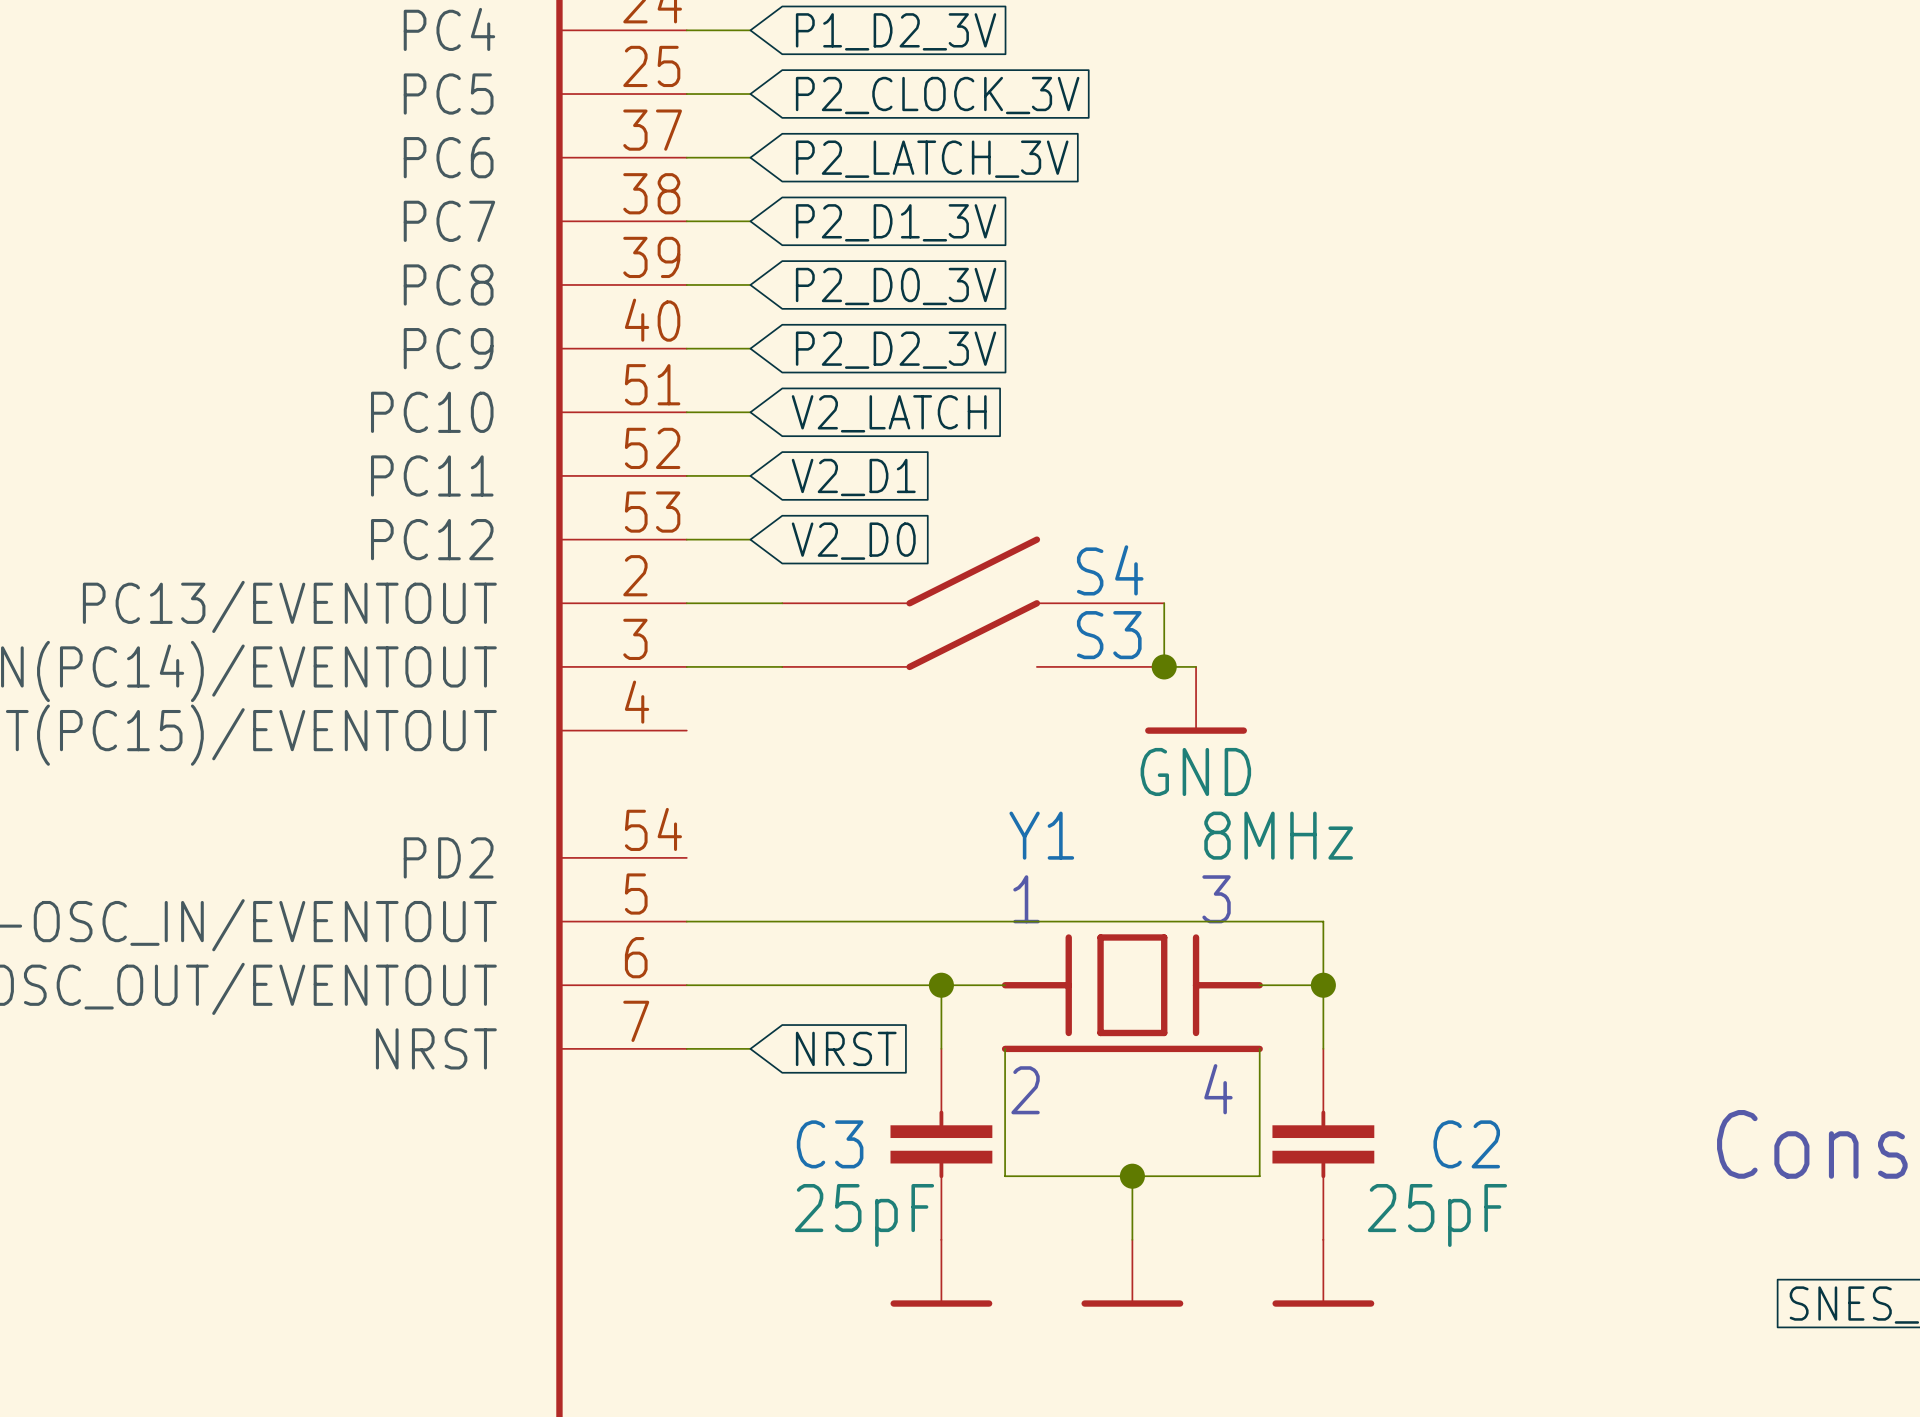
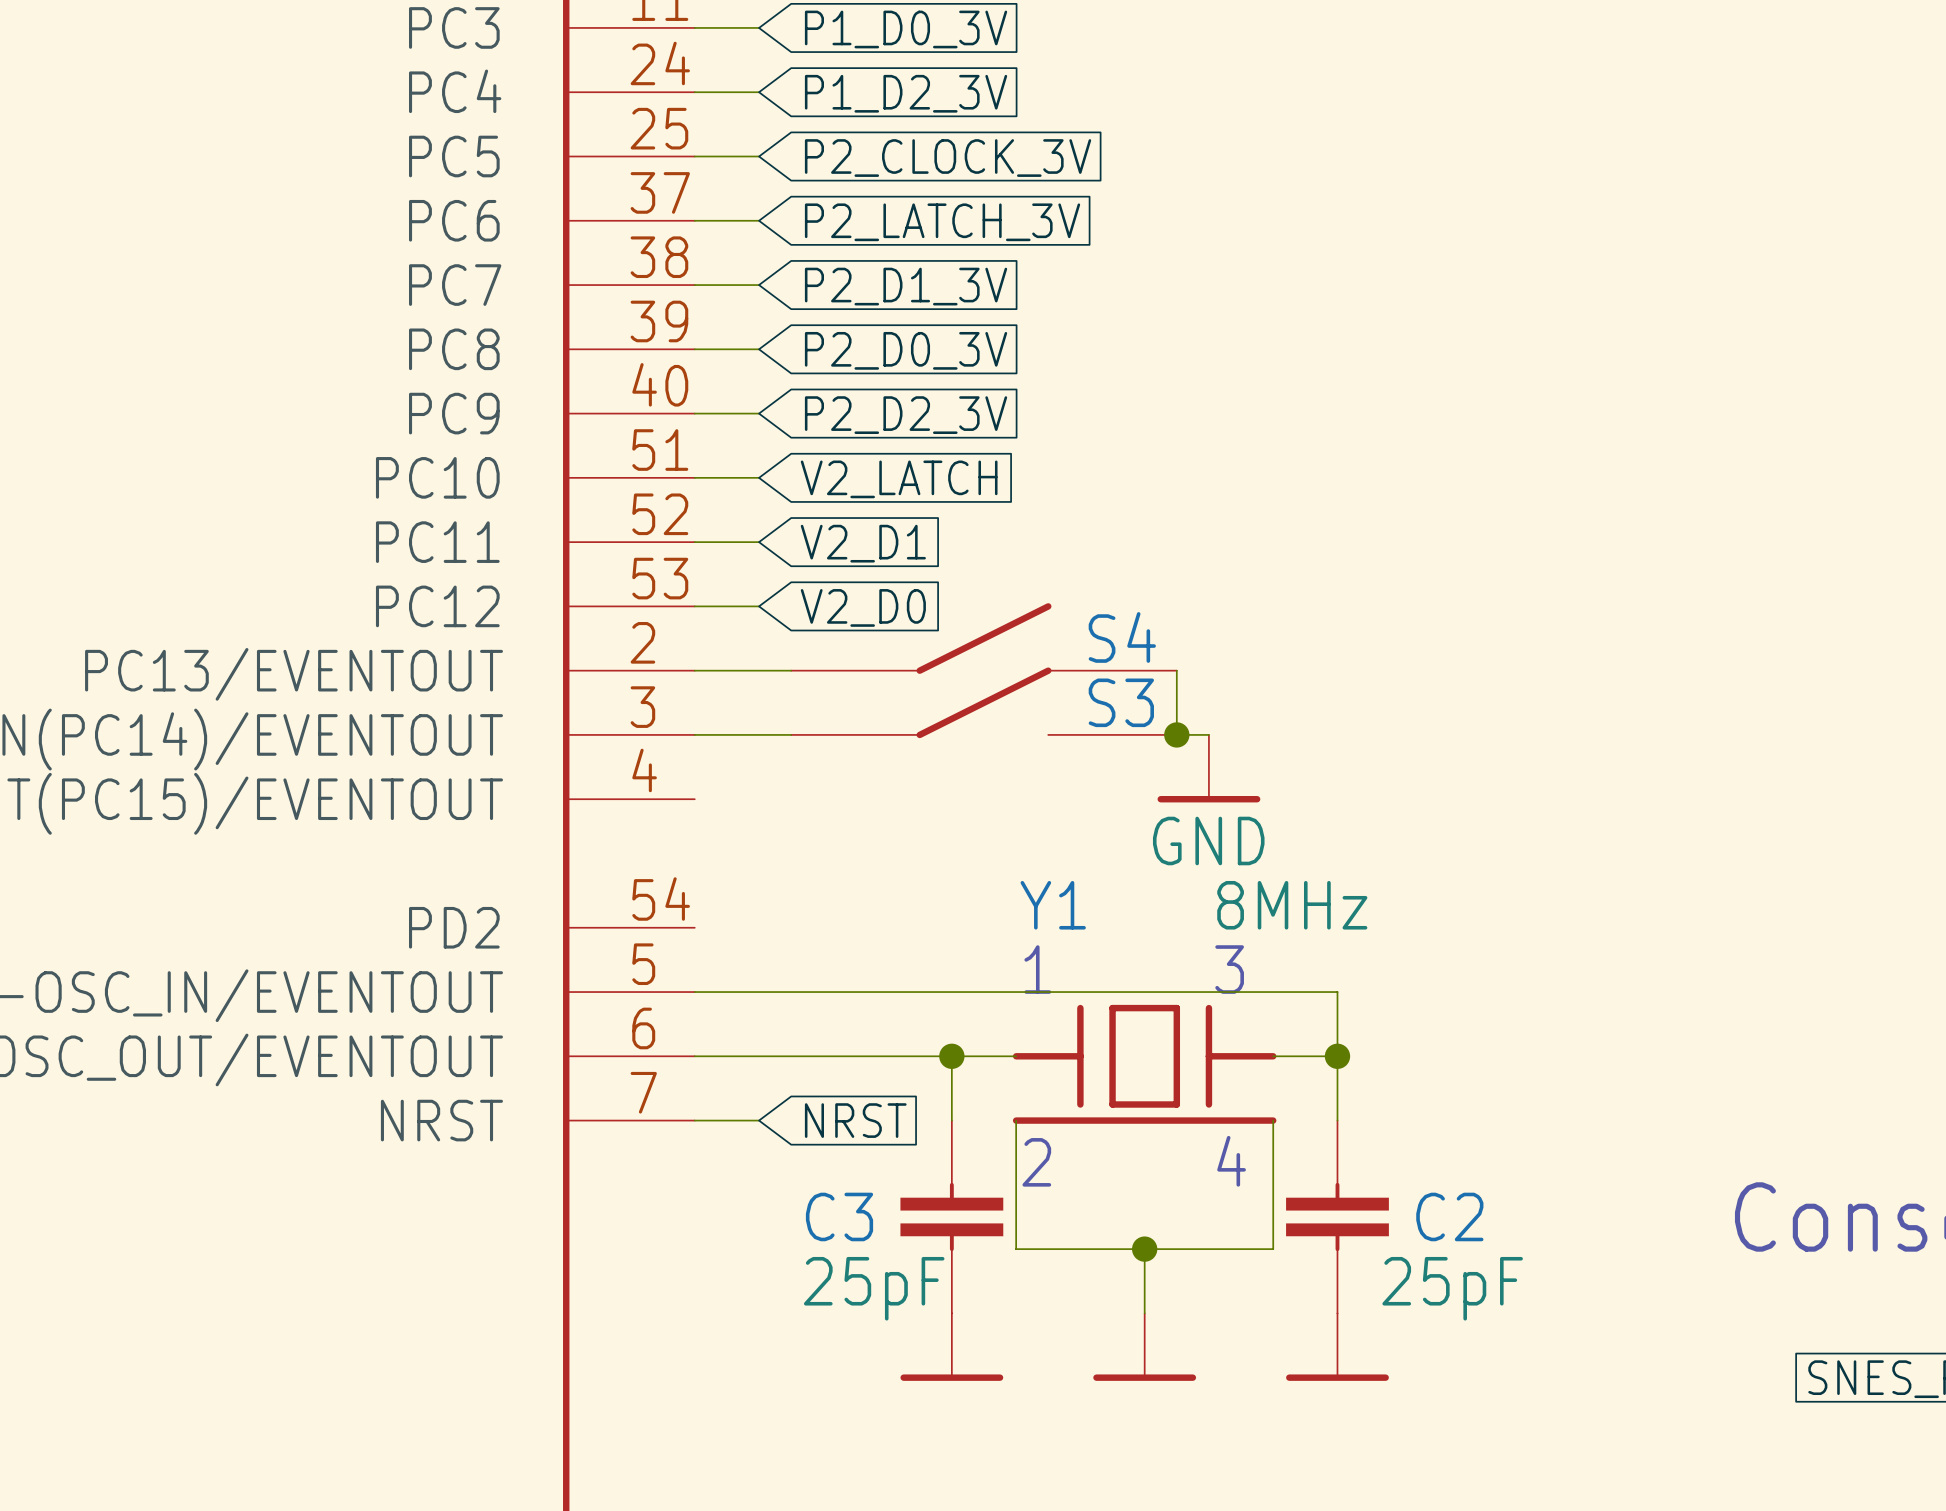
C2 name position: C2 (1466, 1144) -> C2 (1449, 1216)

